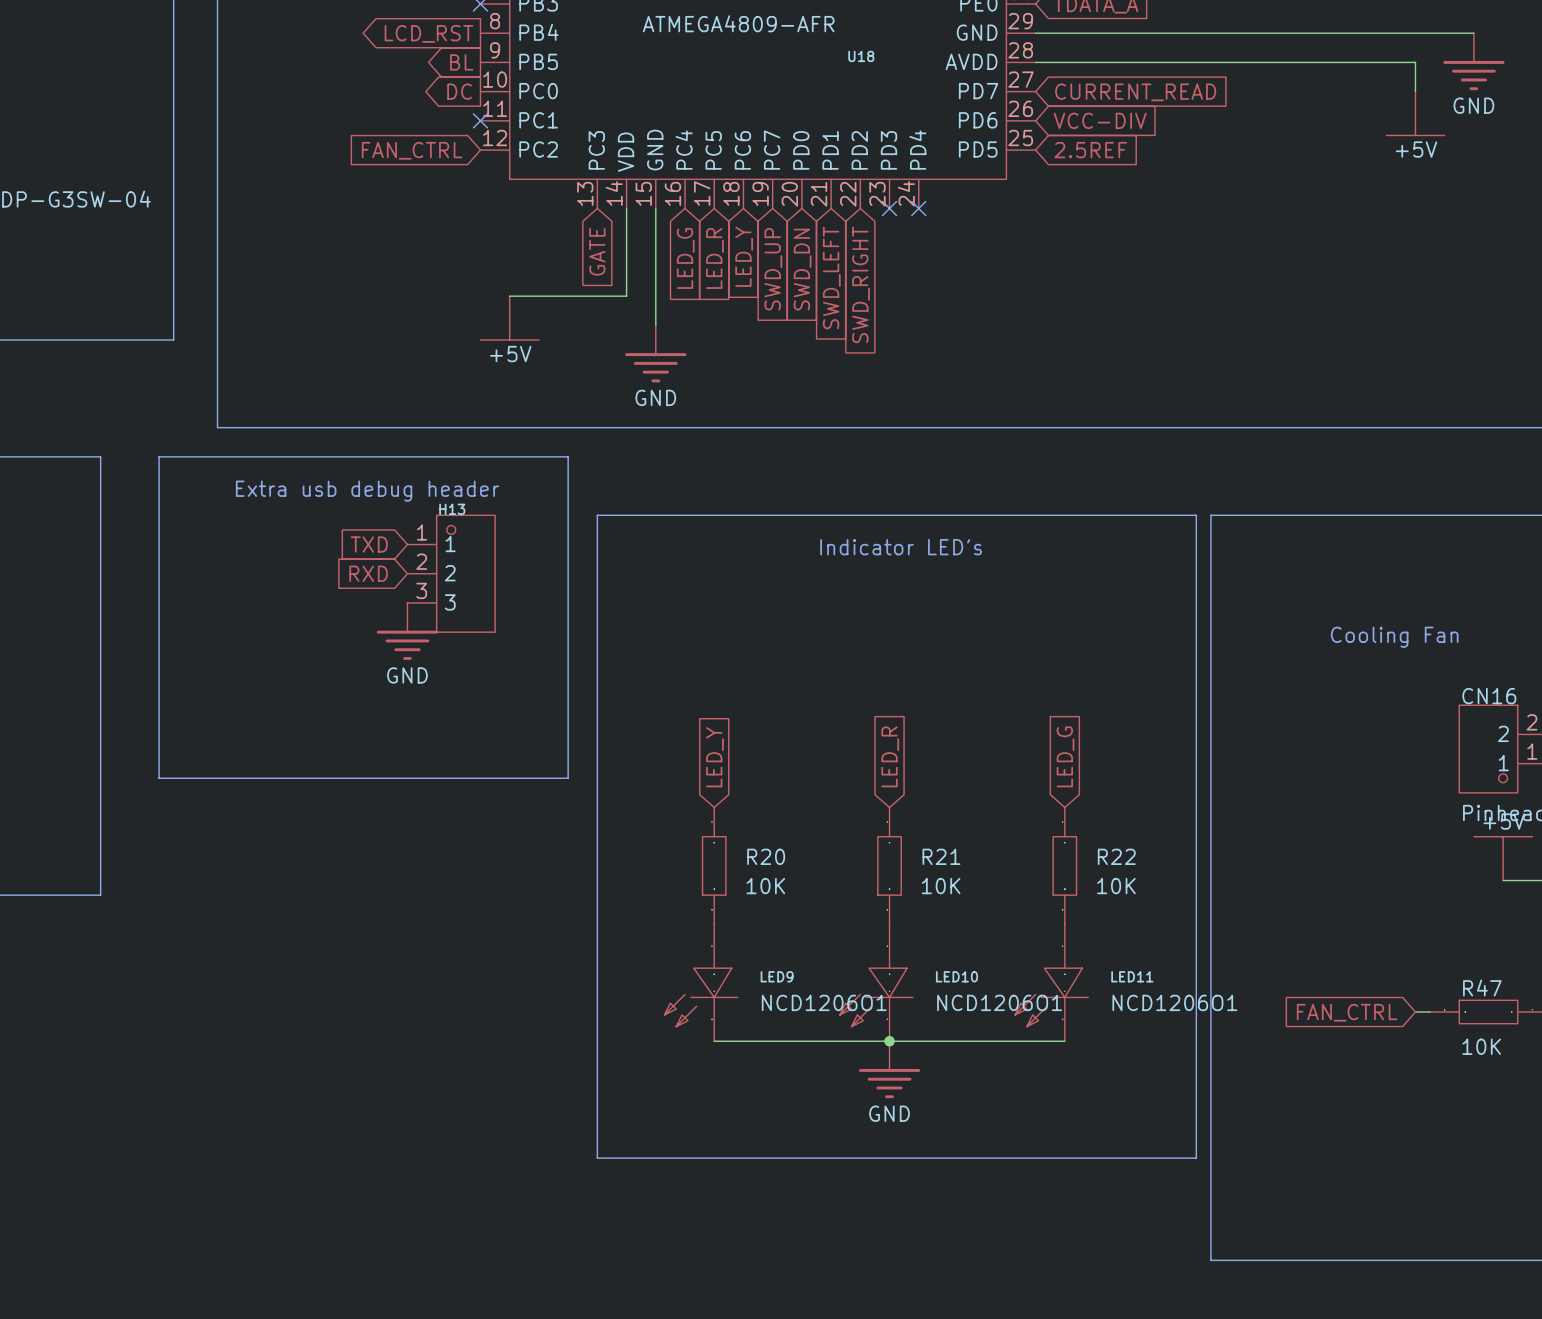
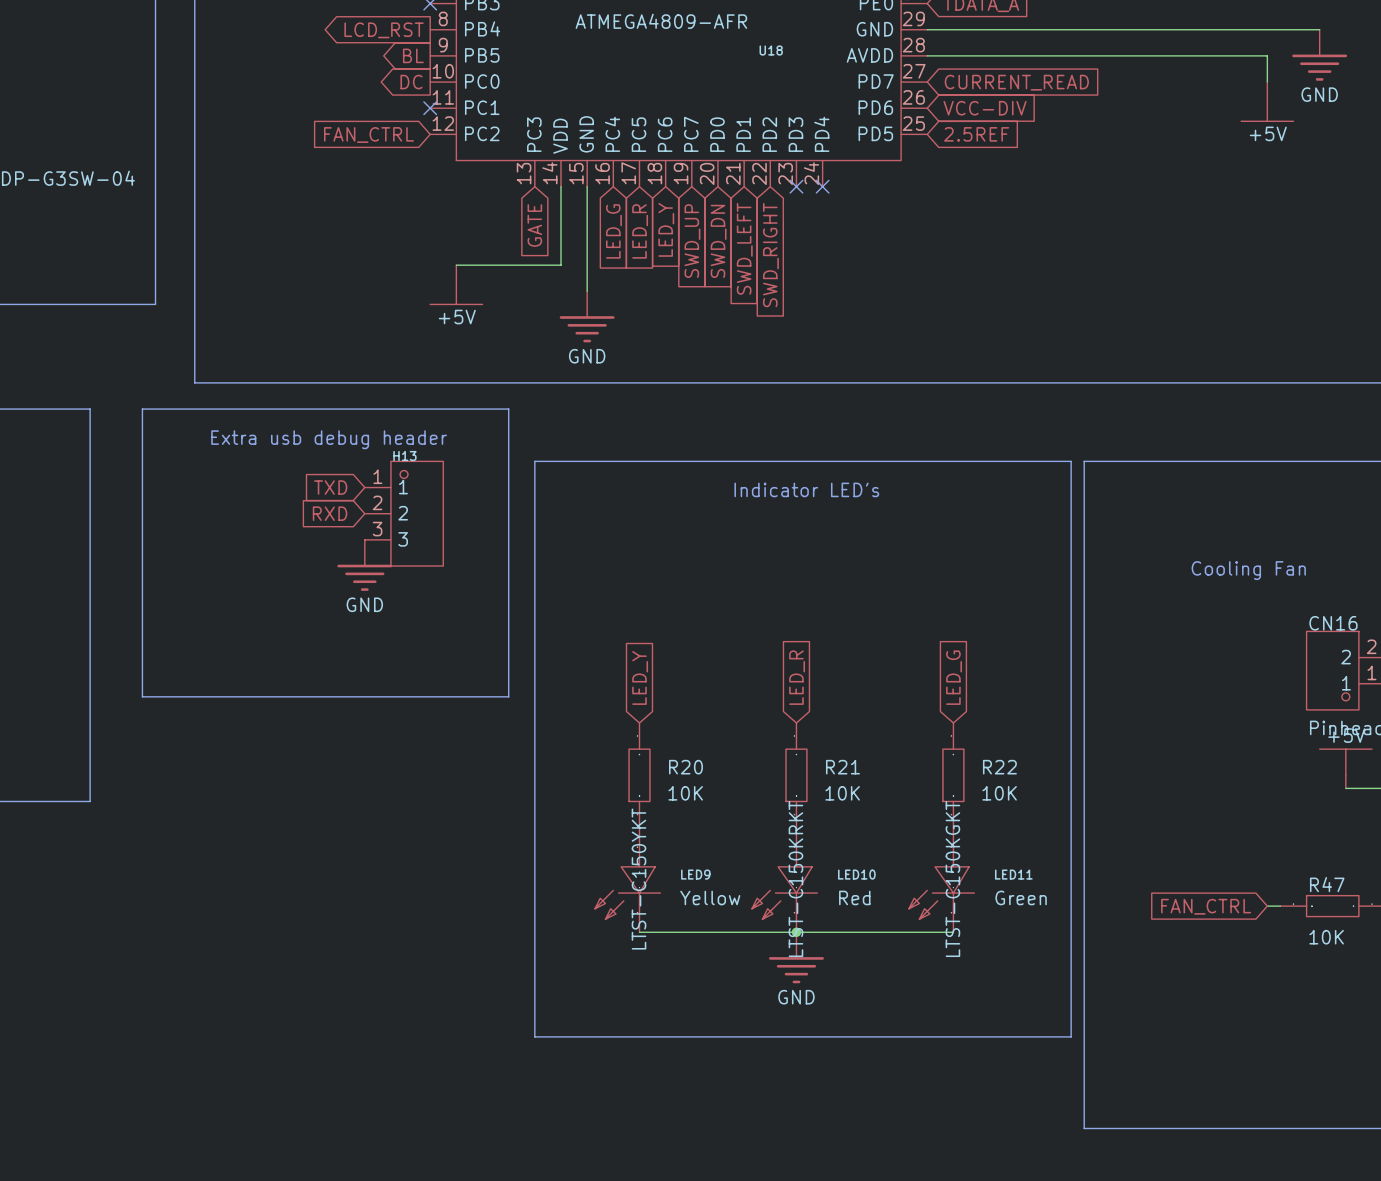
LED9 text: none -> LTST-C150YKT (639, 879)
LED10 text: none -> LTST-C150KRKT (795, 879)
LED11 text: none -> LTST-C150KGKT (952, 879)
LED9 value: NCD1206O1 (824, 1002) -> Yellow (710, 897)
LED10 value: NCD1206O1 (999, 1002) -> Red (854, 897)
LED11 value: NCD1206O1 (1174, 1002) -> Green (1021, 897)

